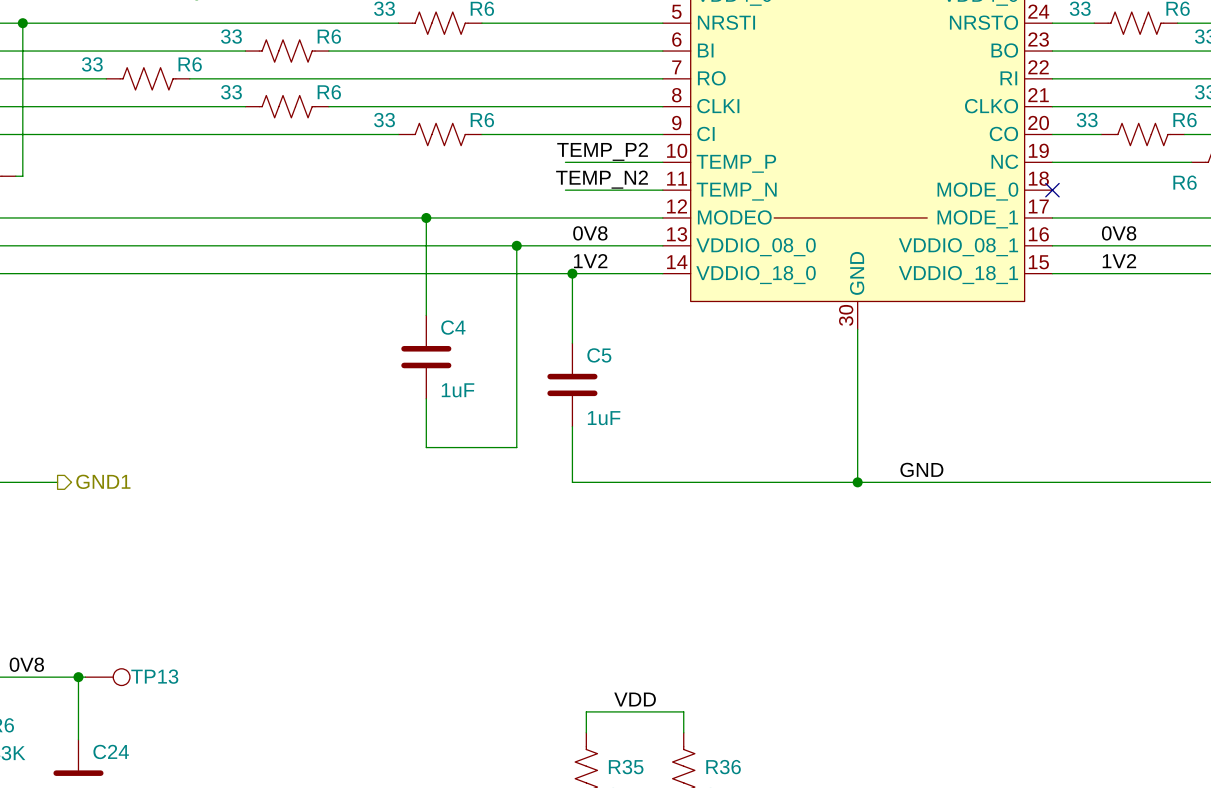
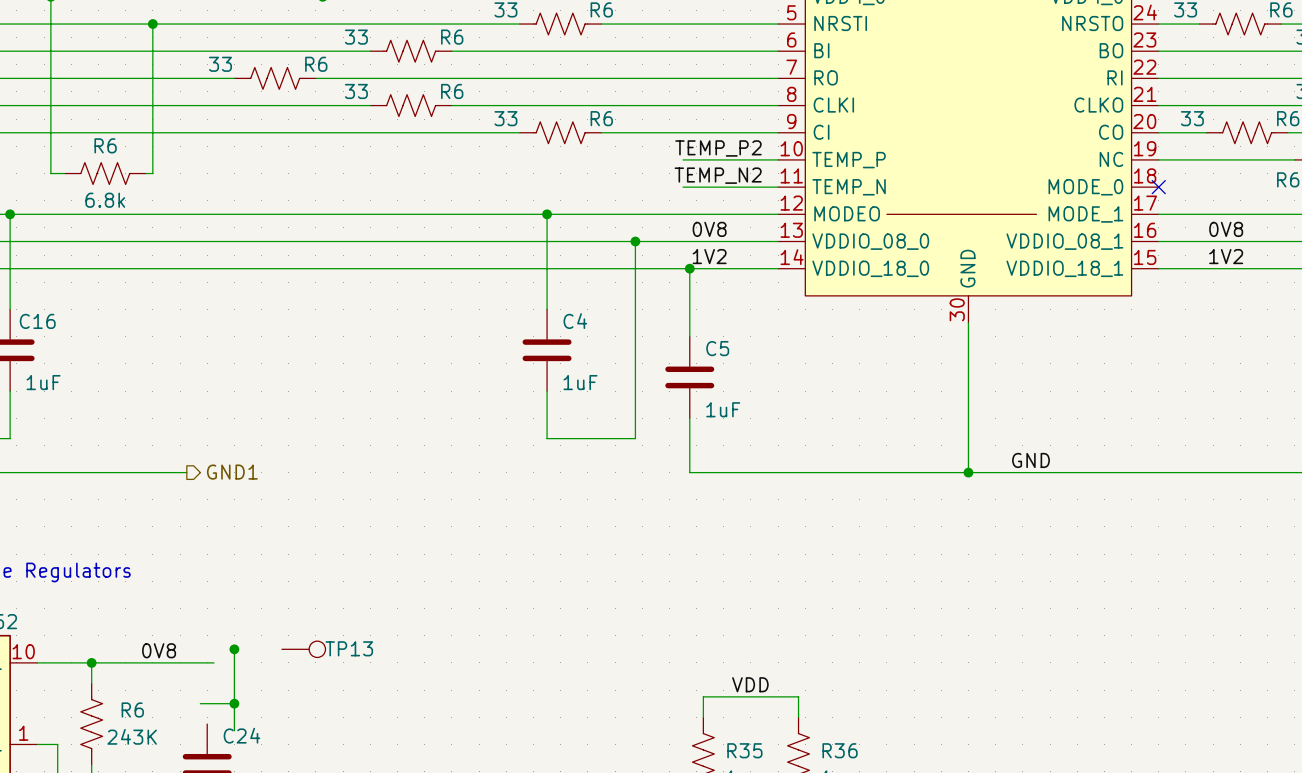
wire: none -> (234, 649) (234, 730)
junction: none -> (234, 649)
wire: (78, 677) (78, 739) -> none
junction: (78, 677) -> none
TP13 position: (107, 677) -> (303, 649)
wire: none -> (200, 703) (234, 703)
junction: none -> (234, 703)

